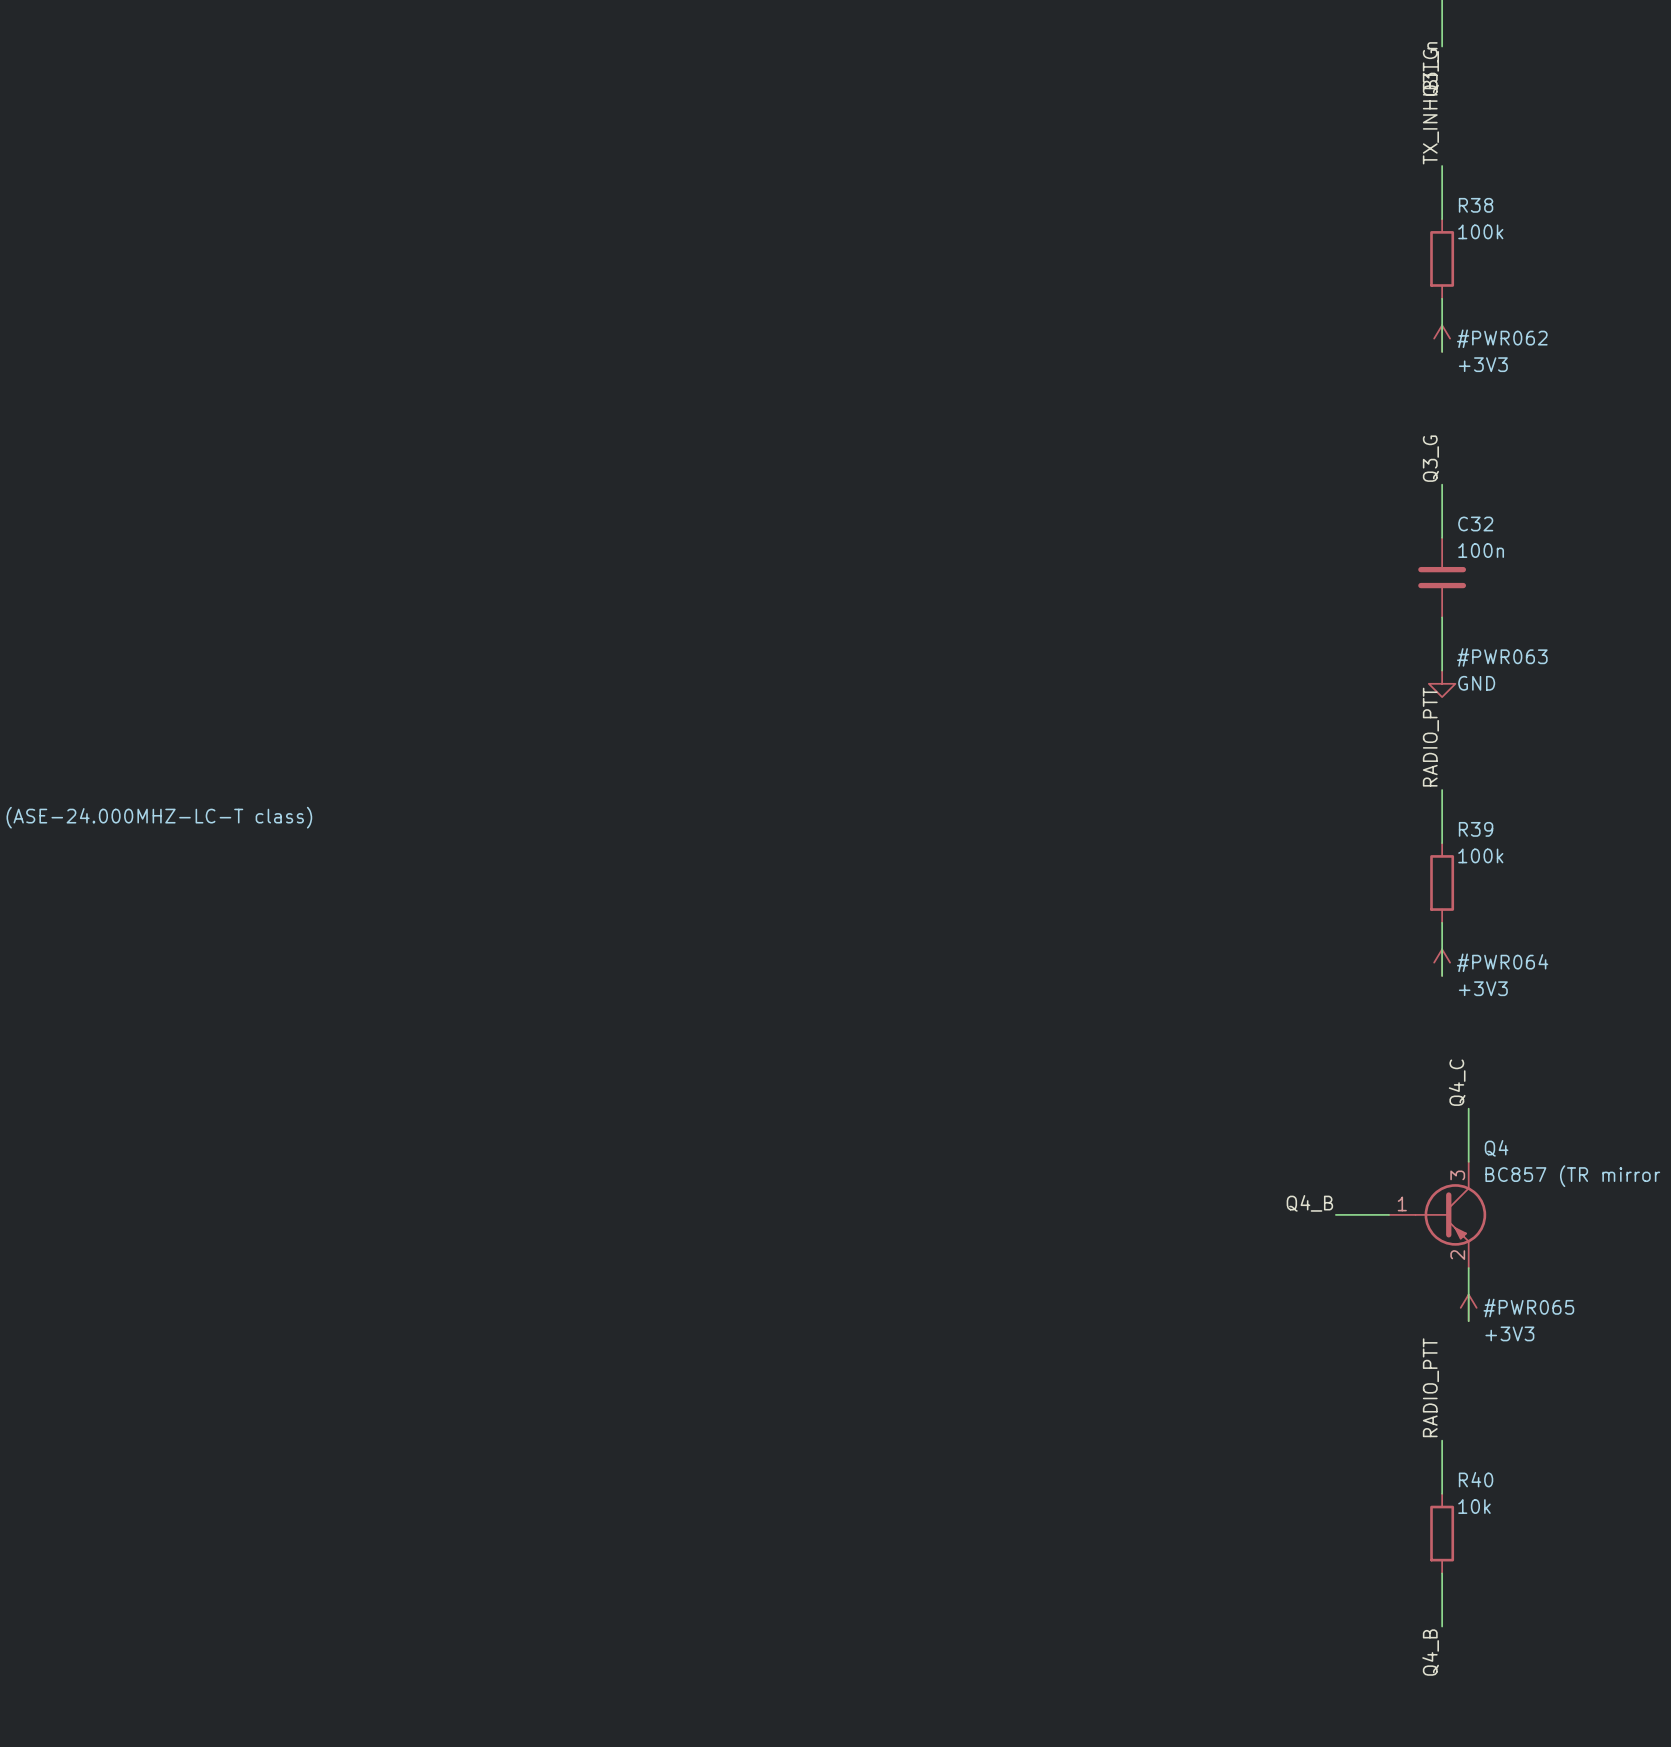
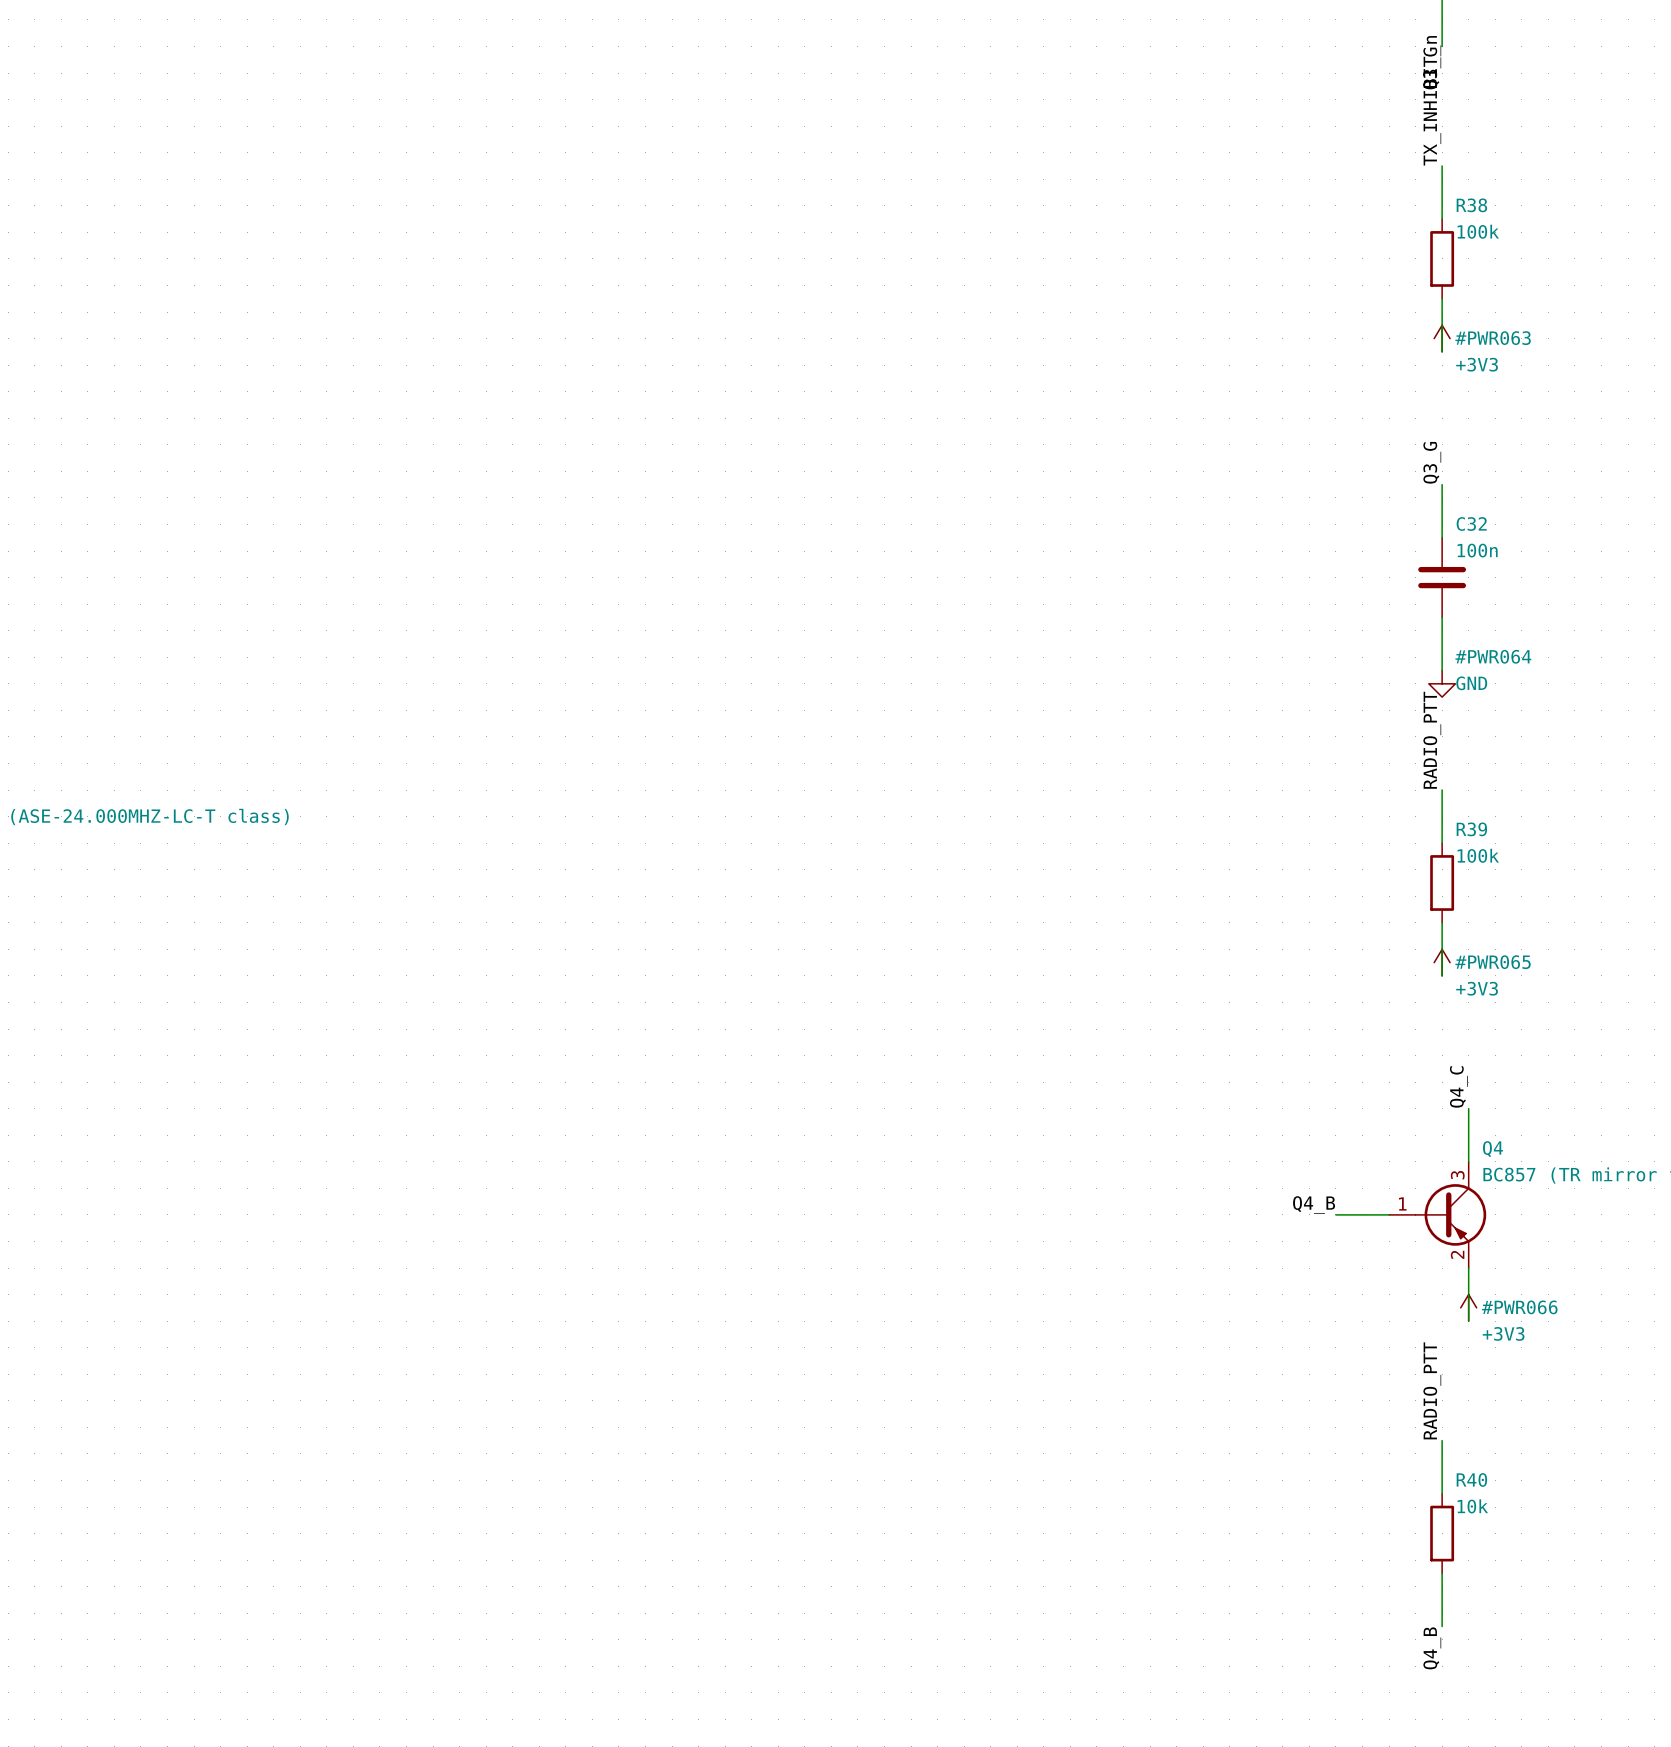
#PWR062 name: #PWR062 (1502, 338) -> #PWR063 (1493, 338)
#PWR063 name: #PWR063 (1502, 657) -> #PWR064 (1493, 656)
#PWR064 name: #PWR064 (1502, 962) -> #PWR065 (1493, 962)
#PWR065 name: #PWR065 (1528, 1307) -> #PWR066 (1519, 1307)

